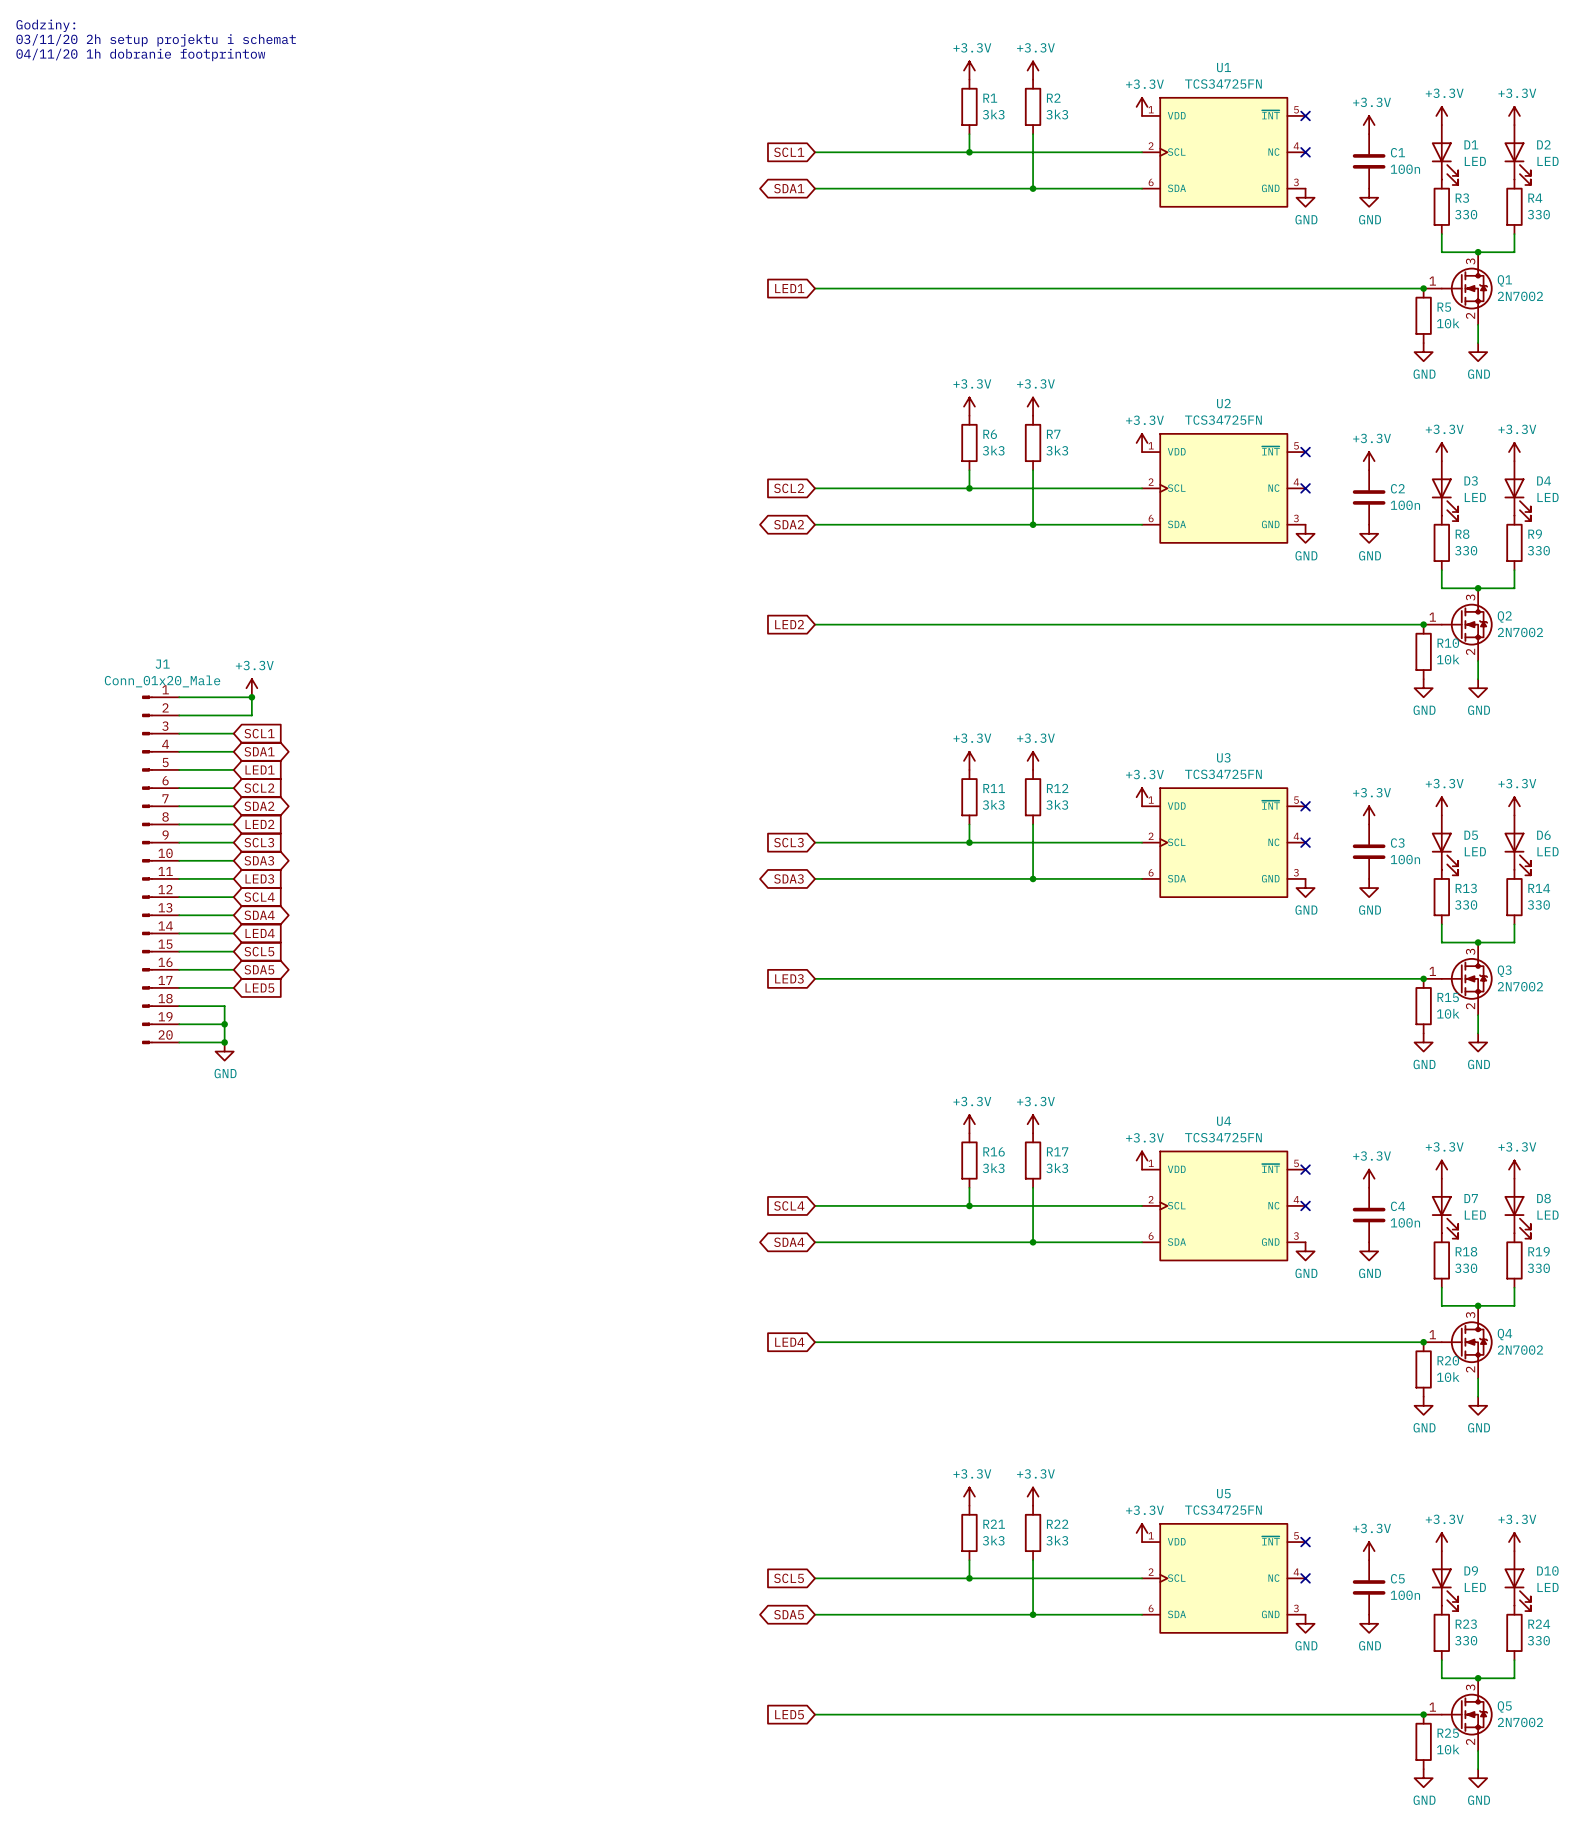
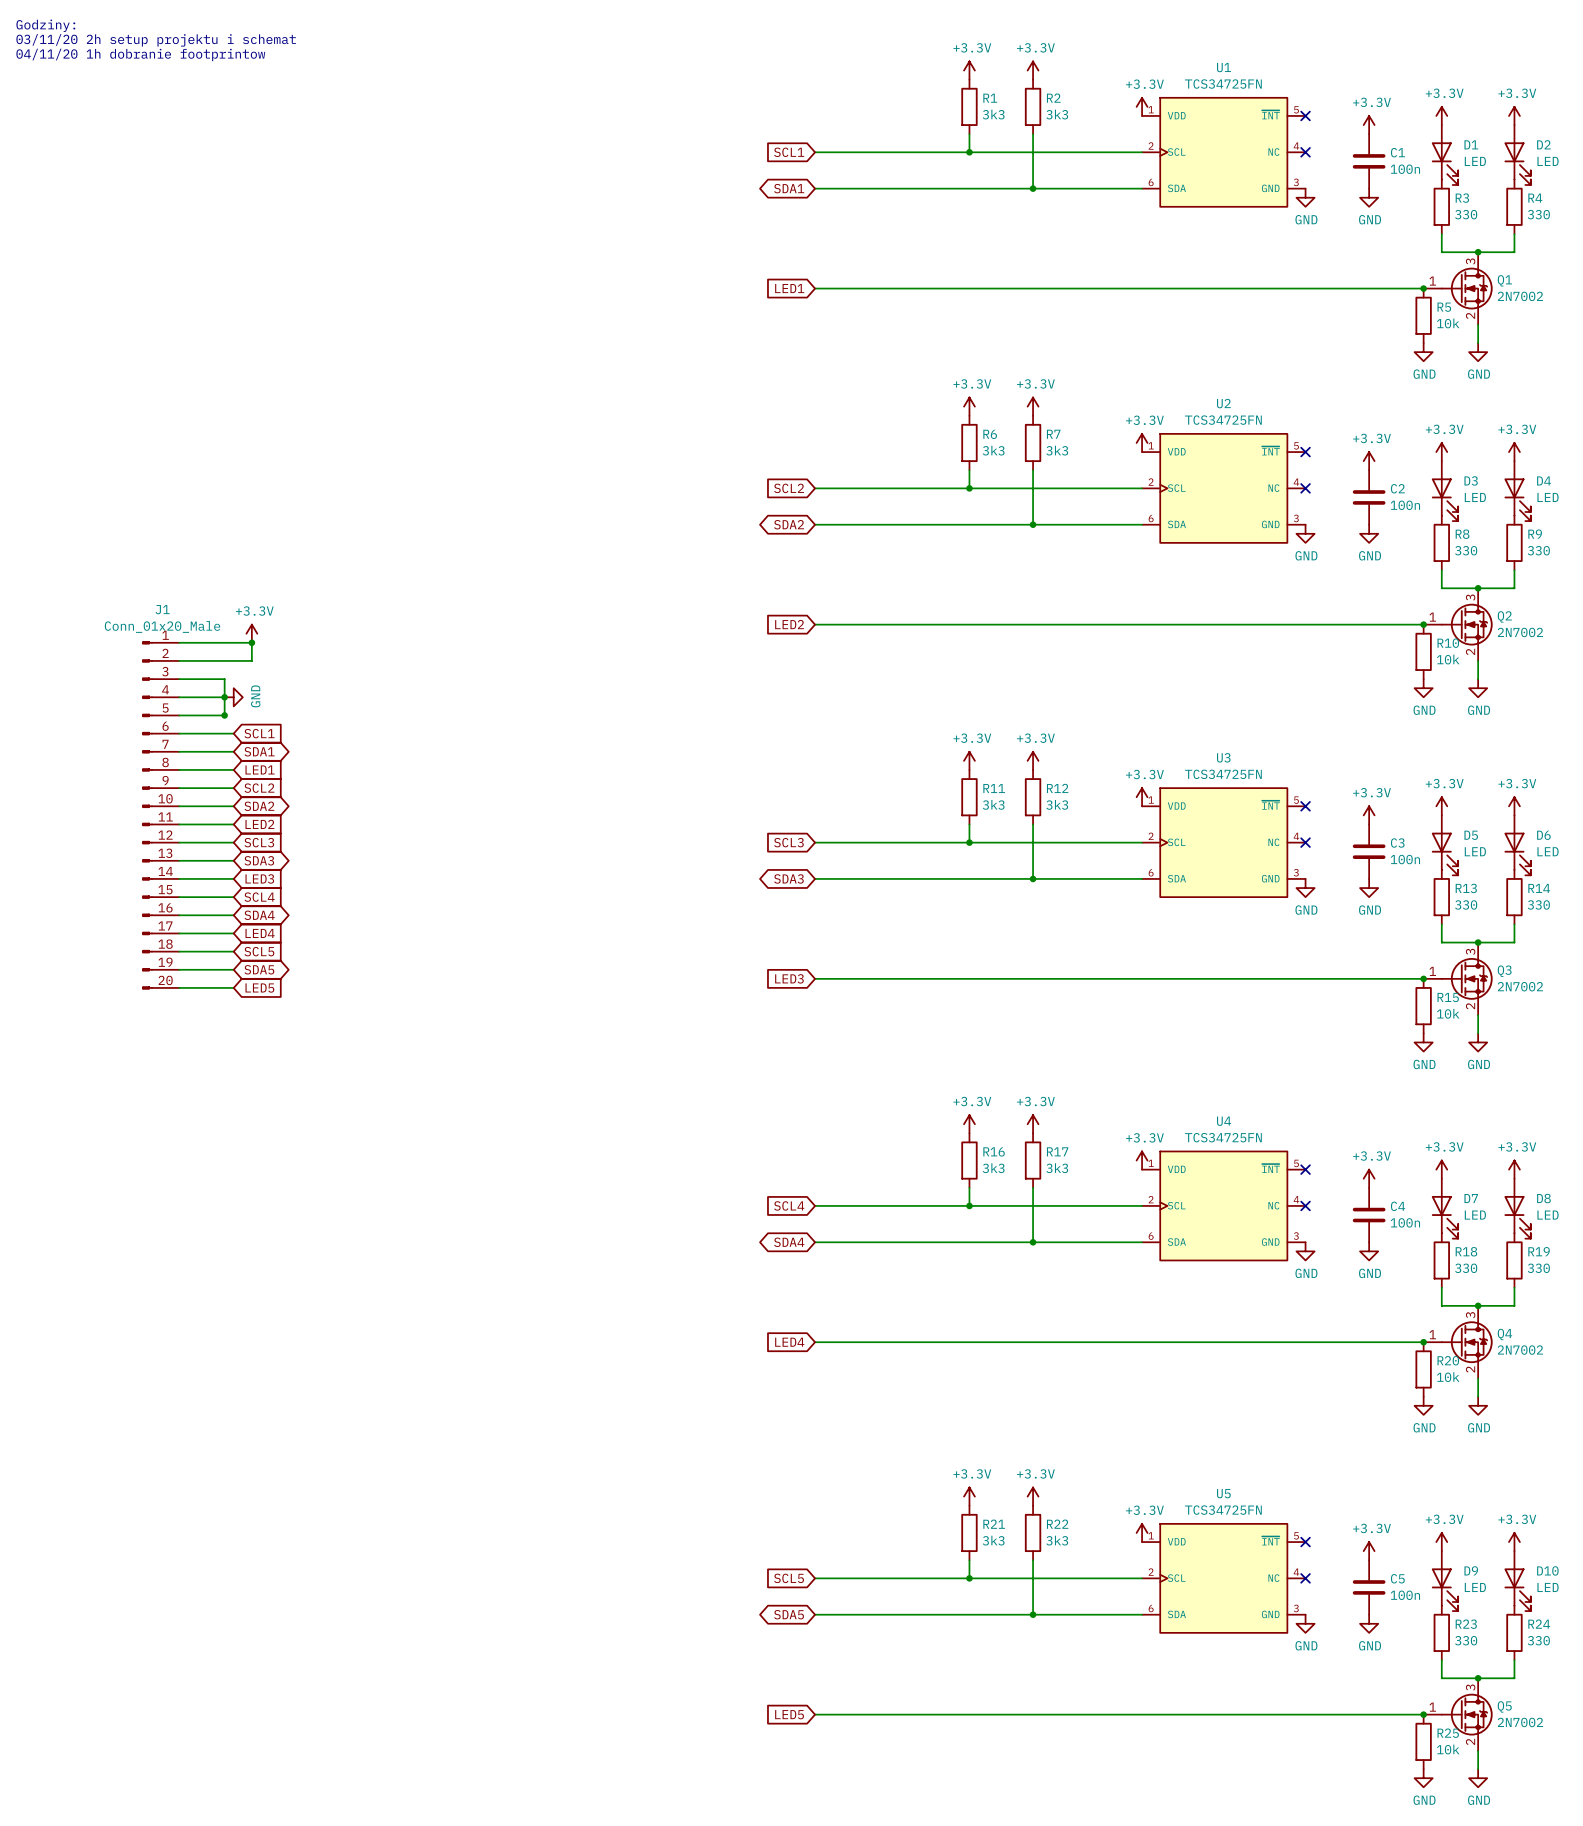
wire: none -> (179, 642) (251, 642) (251, 660) (179, 660)
junction: none -> (251, 642)
power symbol position: +3.3V (251, 688) -> +3.3V (251, 633)
wire: (224, 697) (251, 697) (251, 715) (224, 715) -> (179, 679) (224, 679) (224, 715)
junction: none -> (224, 697)
power symbol: none -> GND (233, 697)
junction: (251, 697) -> none
junction: none -> (224, 715)
J1 position: (160, 869) -> (160, 815)
wire: (179, 1006) (224, 1006) (224, 1042) (179, 1042) -> none
wire: (179, 1024) (224, 1024) -> none
junction: (224, 1024) -> none
junction: (224, 1042) -> none
power symbol: GND (224, 1051) -> none

